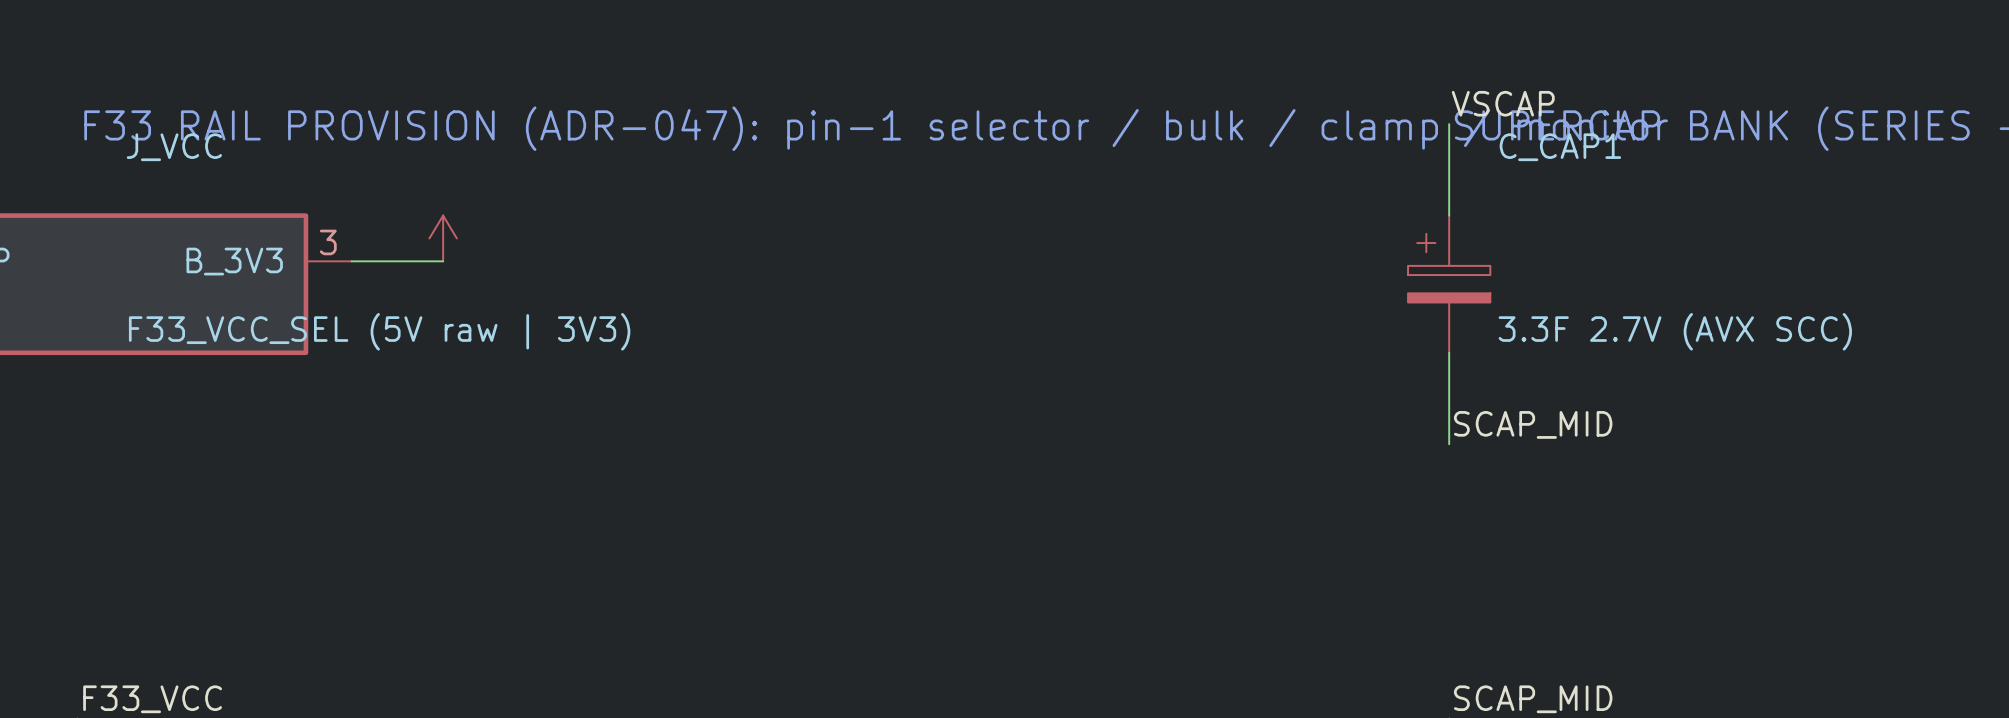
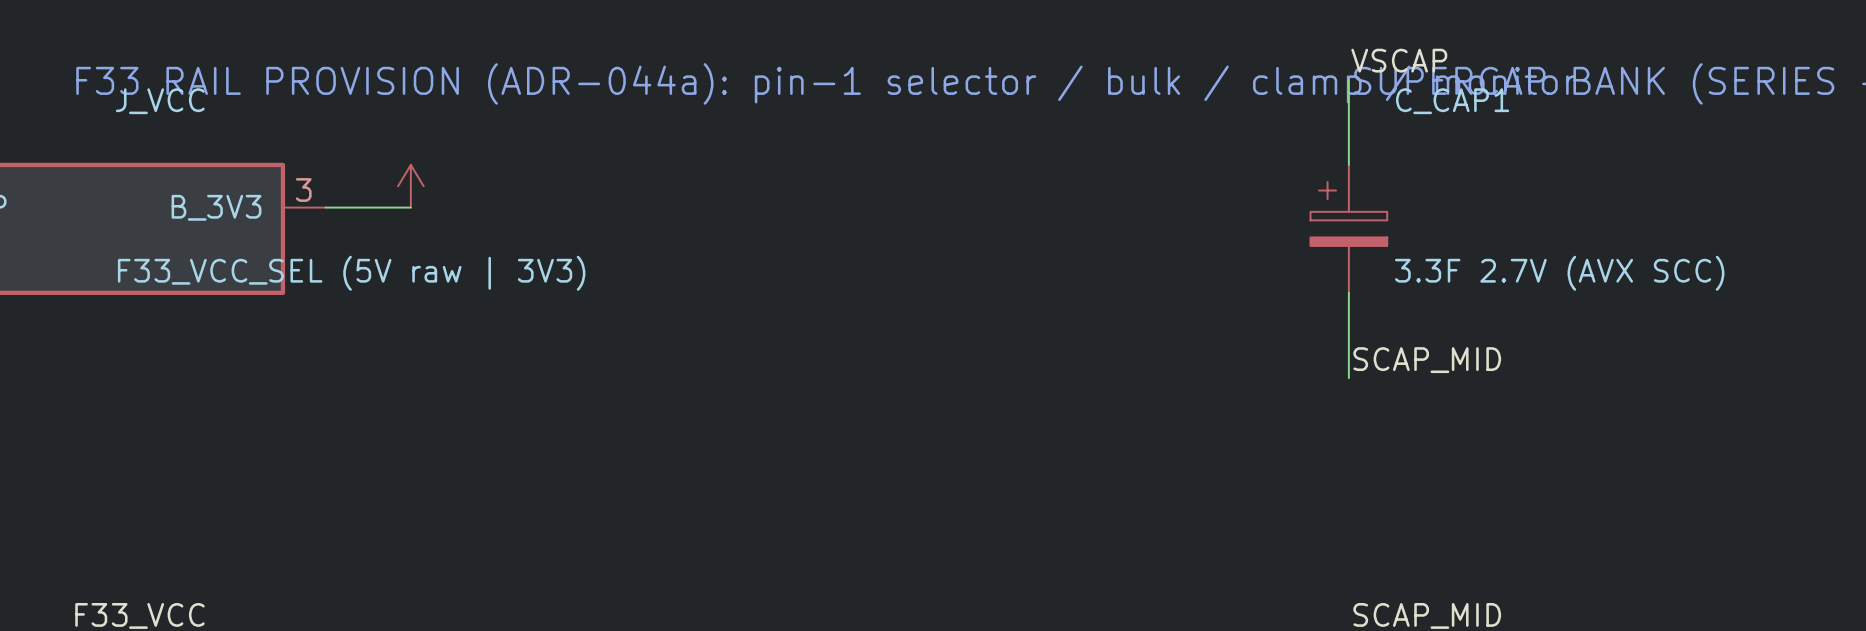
text: F33 RAIL PROVISION (ADR-047): pin-1 selector / bulk / clamp / monitor (876, 128) -> F33 RAIL PROVISION (ADR-044a): pin-1 selector / bulk / clamp / monitor (826, 83)

